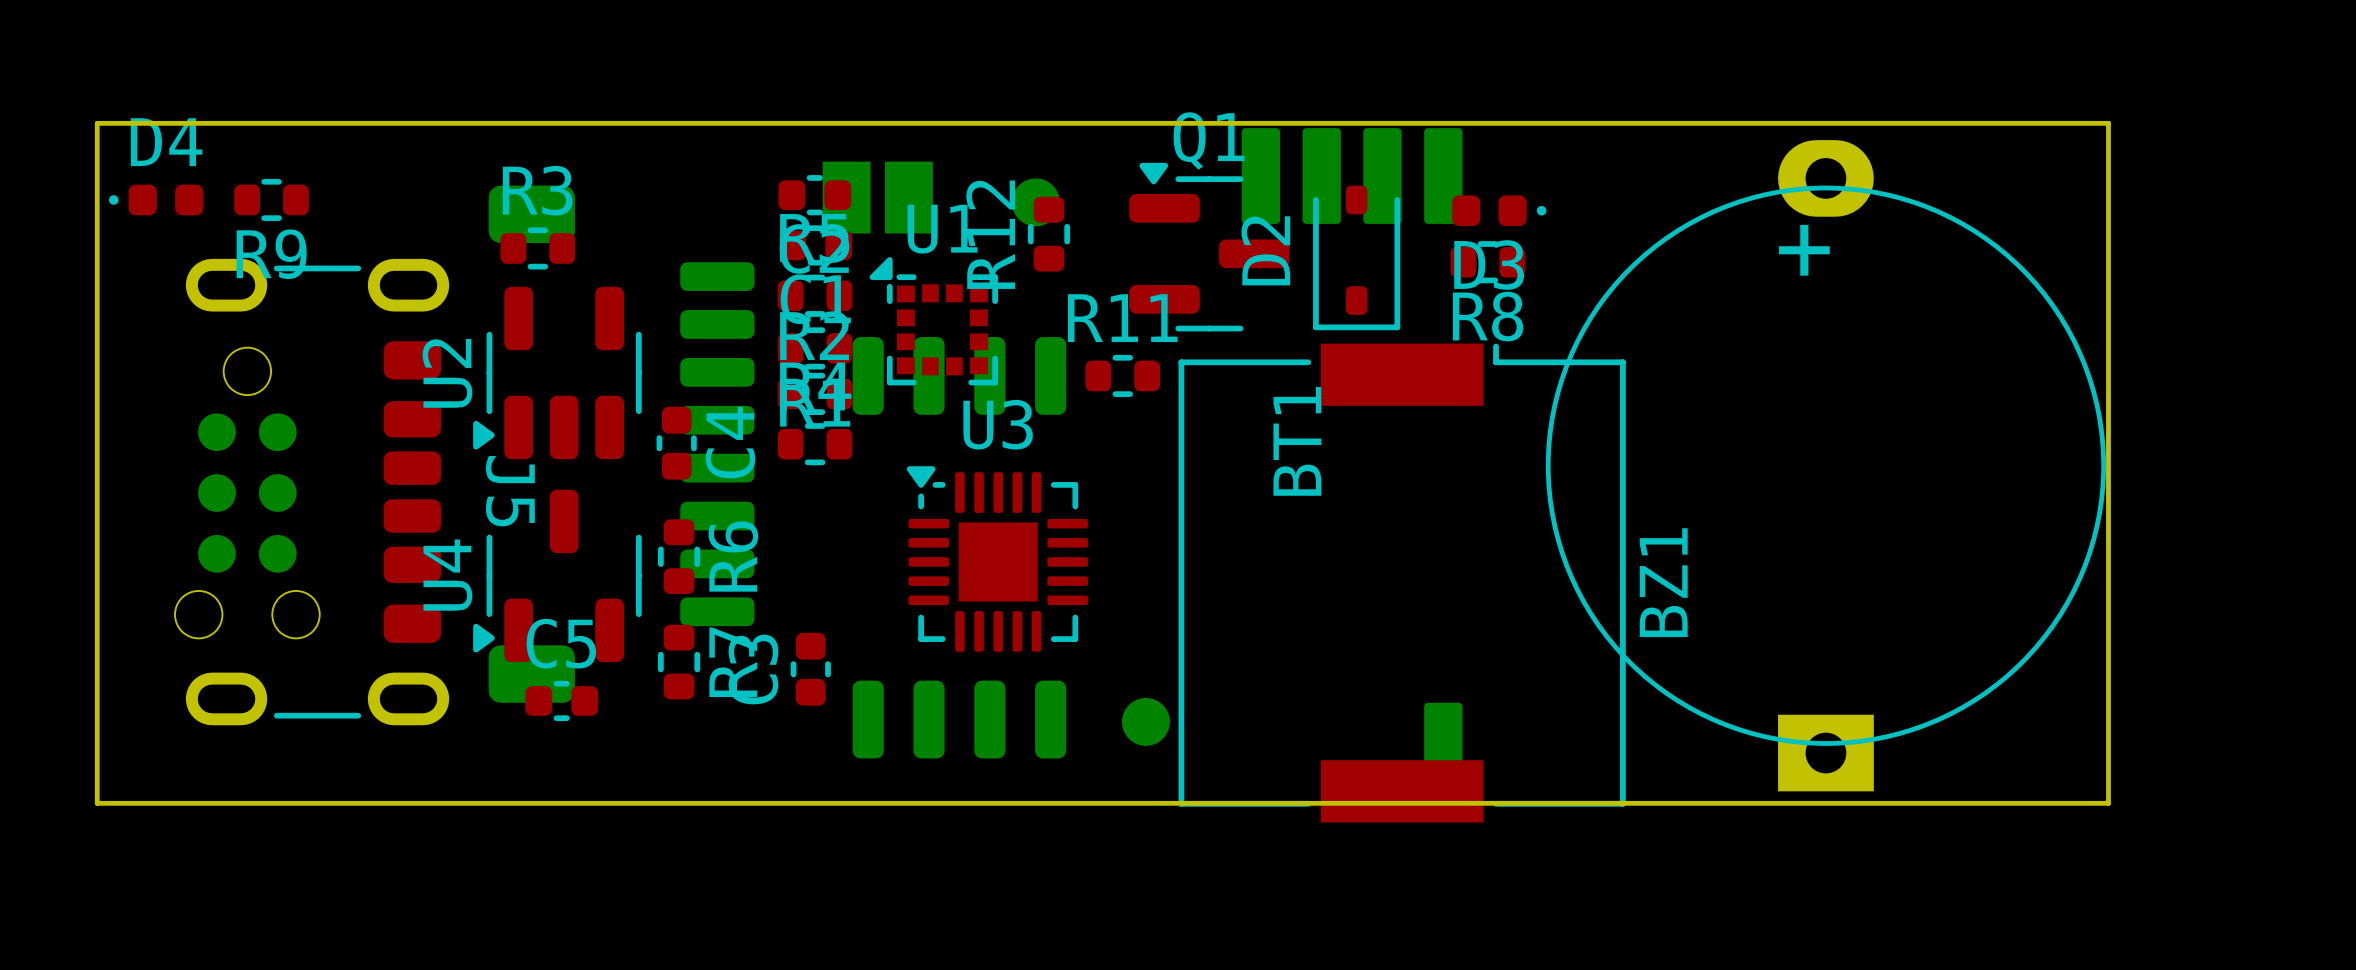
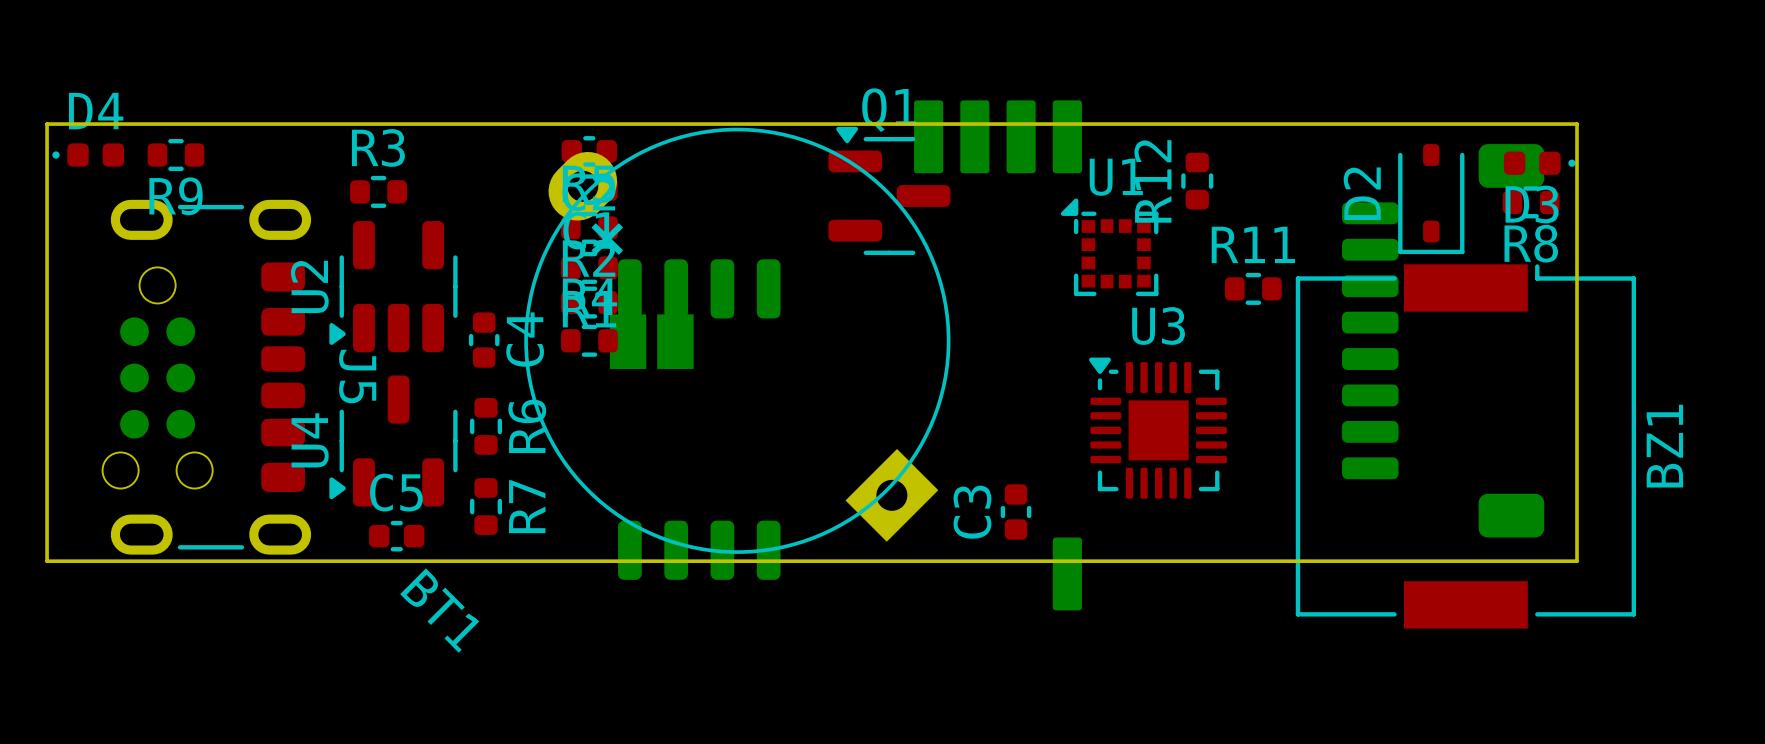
board edge: (97, 123) (2108, 123) (2108, 803) (97, 803) (97, 123) -> (47, 124) (47, 561) (1577, 561) (1577, 124) (47, 124)
part position: (877, 197) -> (651, 341)
part: (1035, 202) -> none
D3 position: (1499, 210) -> (1539, 163)
R12 position: (1048, 234) -> (1197, 181)
D2 position: (1356, 257) -> (1431, 199)
R8 position: (1487, 262) -> (1531, 202)
U1 position: (933, 321) -> (1109, 247)
R11 position: (1122, 375) -> (1253, 288)
part: (621, 444) -> none
part: none -> (1443, 340)
BT1 rotation: 0° (1825, 465) -> 45° counterclockwise (737, 340)
BT1 position: (1825, 465) -> (737, 340)
U3 position: (997, 558) -> (1158, 428)
BZ1 position: (1402, 583) -> (1465, 446)
C3 position: (810, 669) -> (1016, 512)
part: (1145, 721) -> none

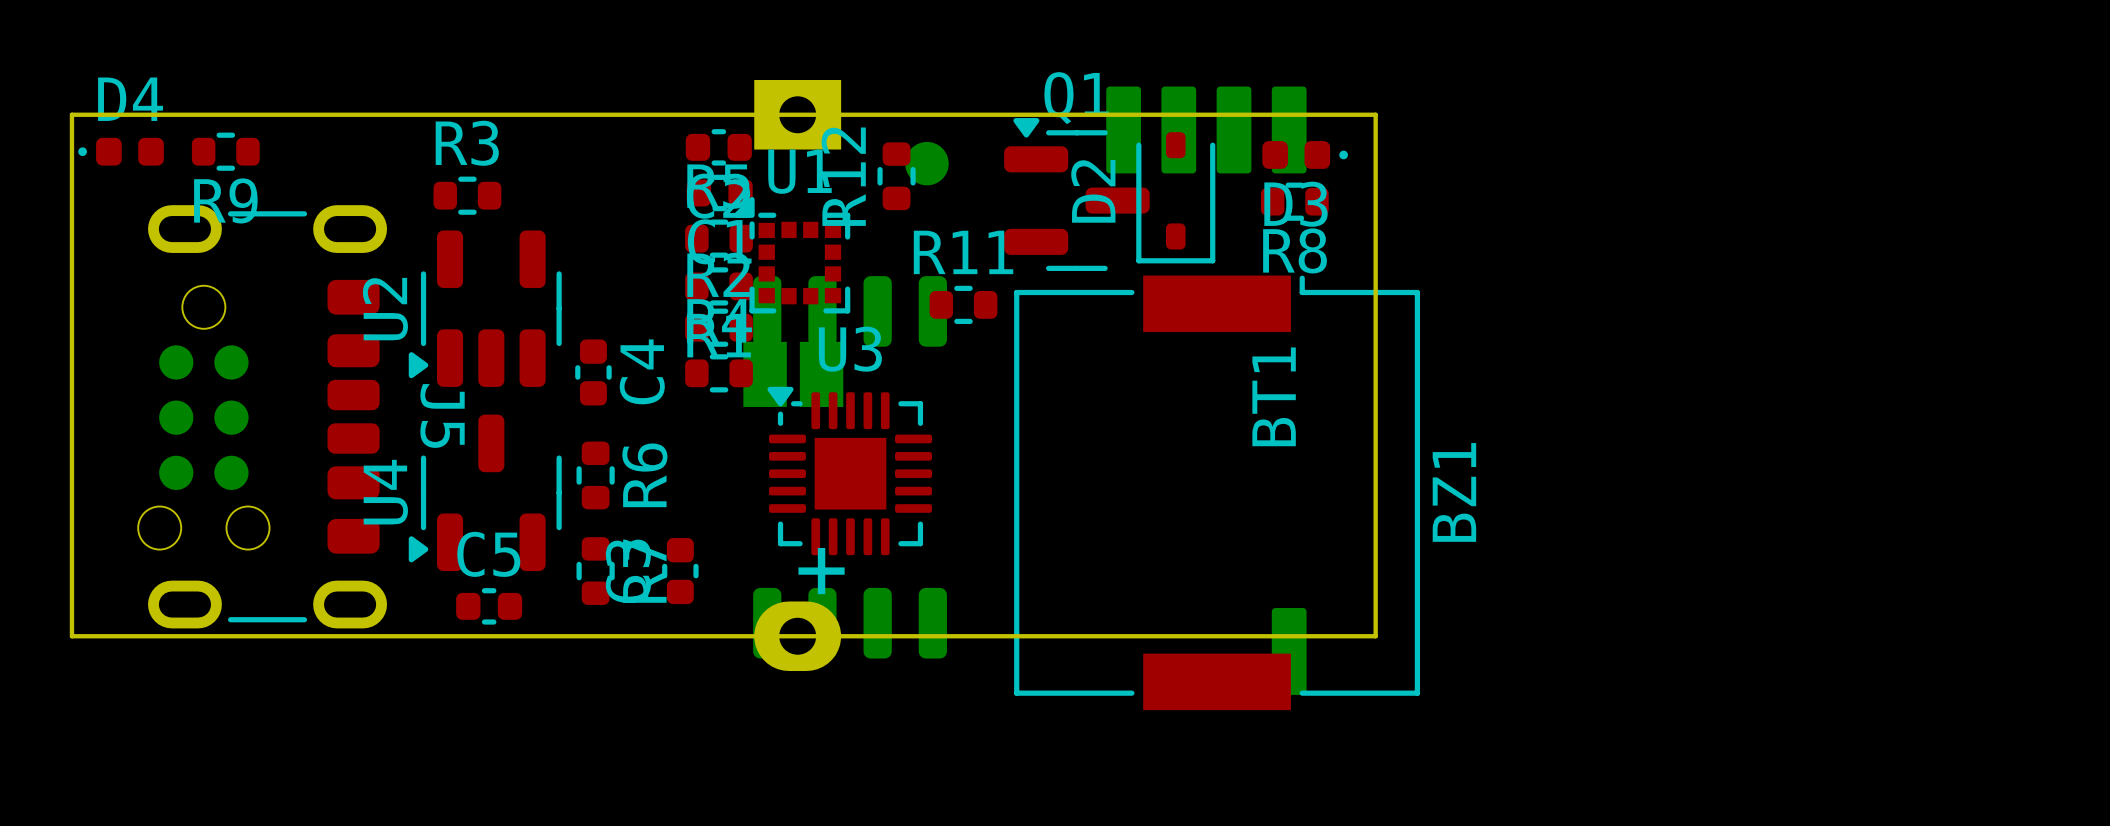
board edge: (1139, 124) (1577, 124) (1577, 561) (1139, 561) -> (1375, 114) (1375, 636)
BT1 footprint: [524, 127, 951, 554] -> [754, 80, 842, 672]
D3 position: (1539, 163) -> (1305, 154)
part: none -> (926, 163)
R12 position: (1197, 181) -> (896, 176)
D2 position: (1431, 199) -> (1175, 197)
R8 position: (1531, 202) -> (1294, 201)
U1 position: (1109, 247) -> (792, 255)
R11 position: (1253, 288) -> (963, 304)
part: (1443, 340) -> none
U3 position: (1158, 428) -> (849, 471)
BZ1 position: (1465, 446) -> (1217, 492)
C3 position: (1016, 512) -> (680, 571)
BT1 name position: BT1 (439, 610) -> BT1 (1274, 396)

